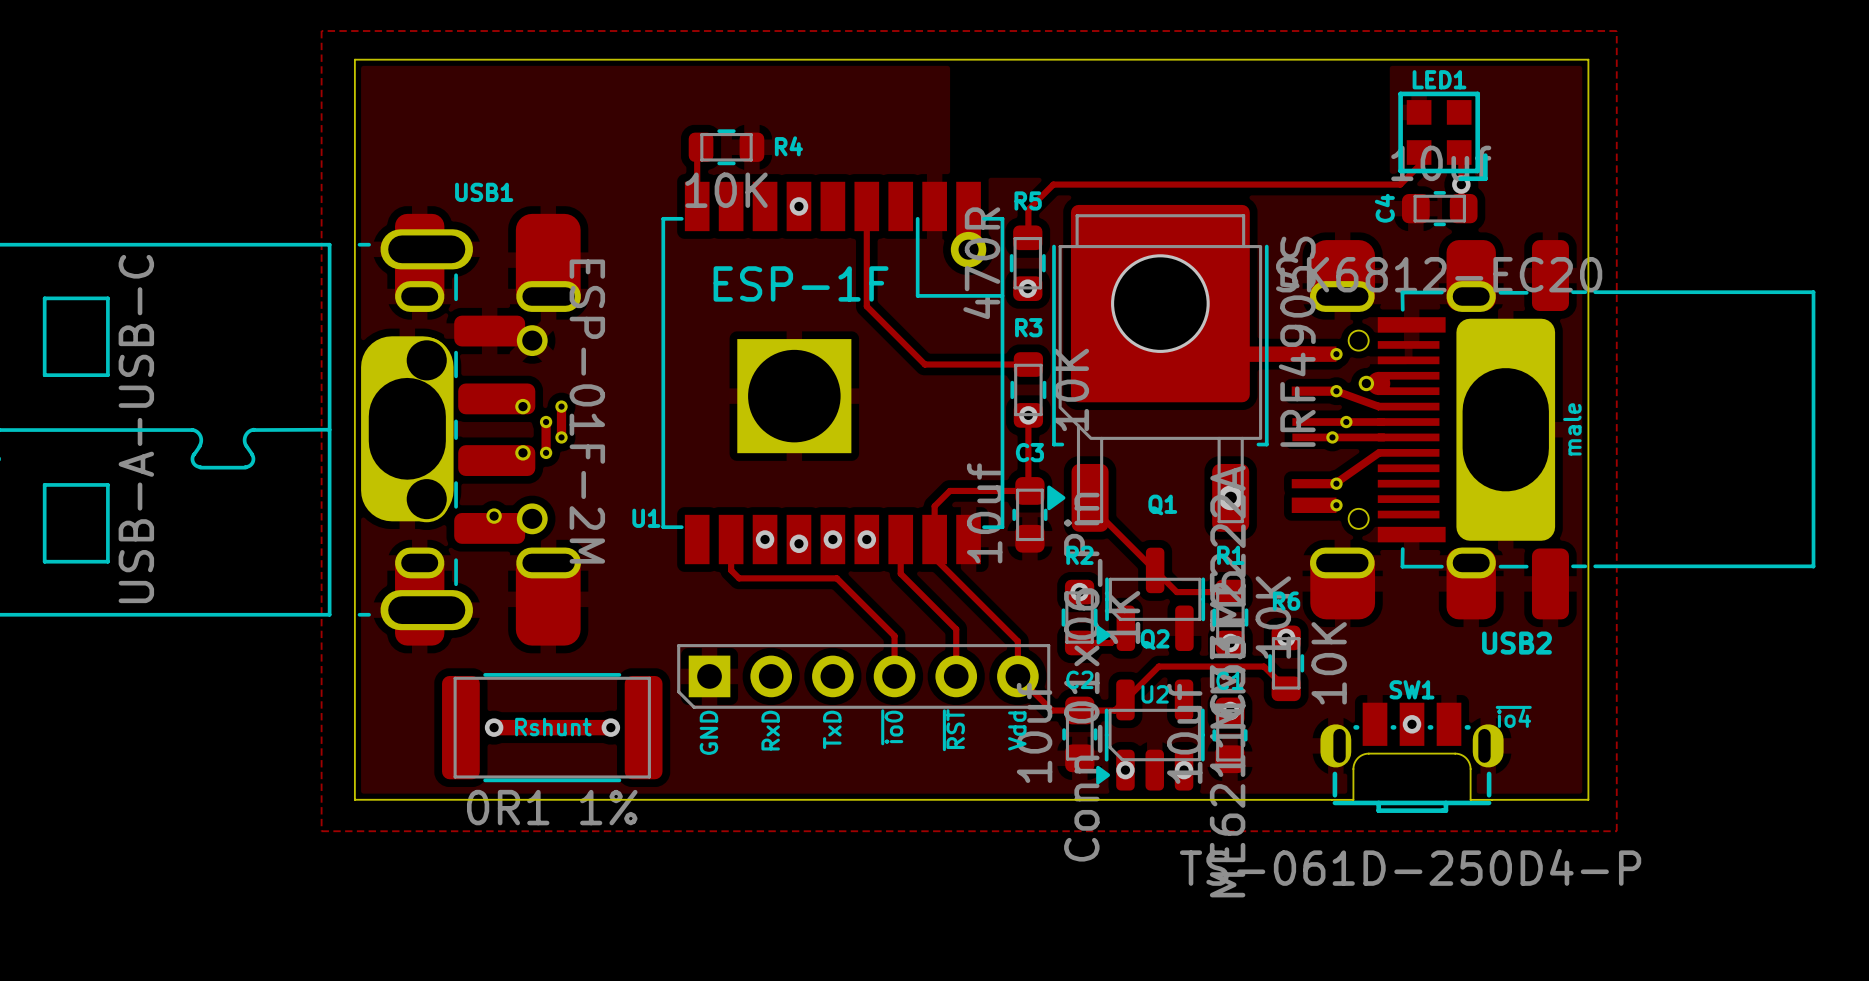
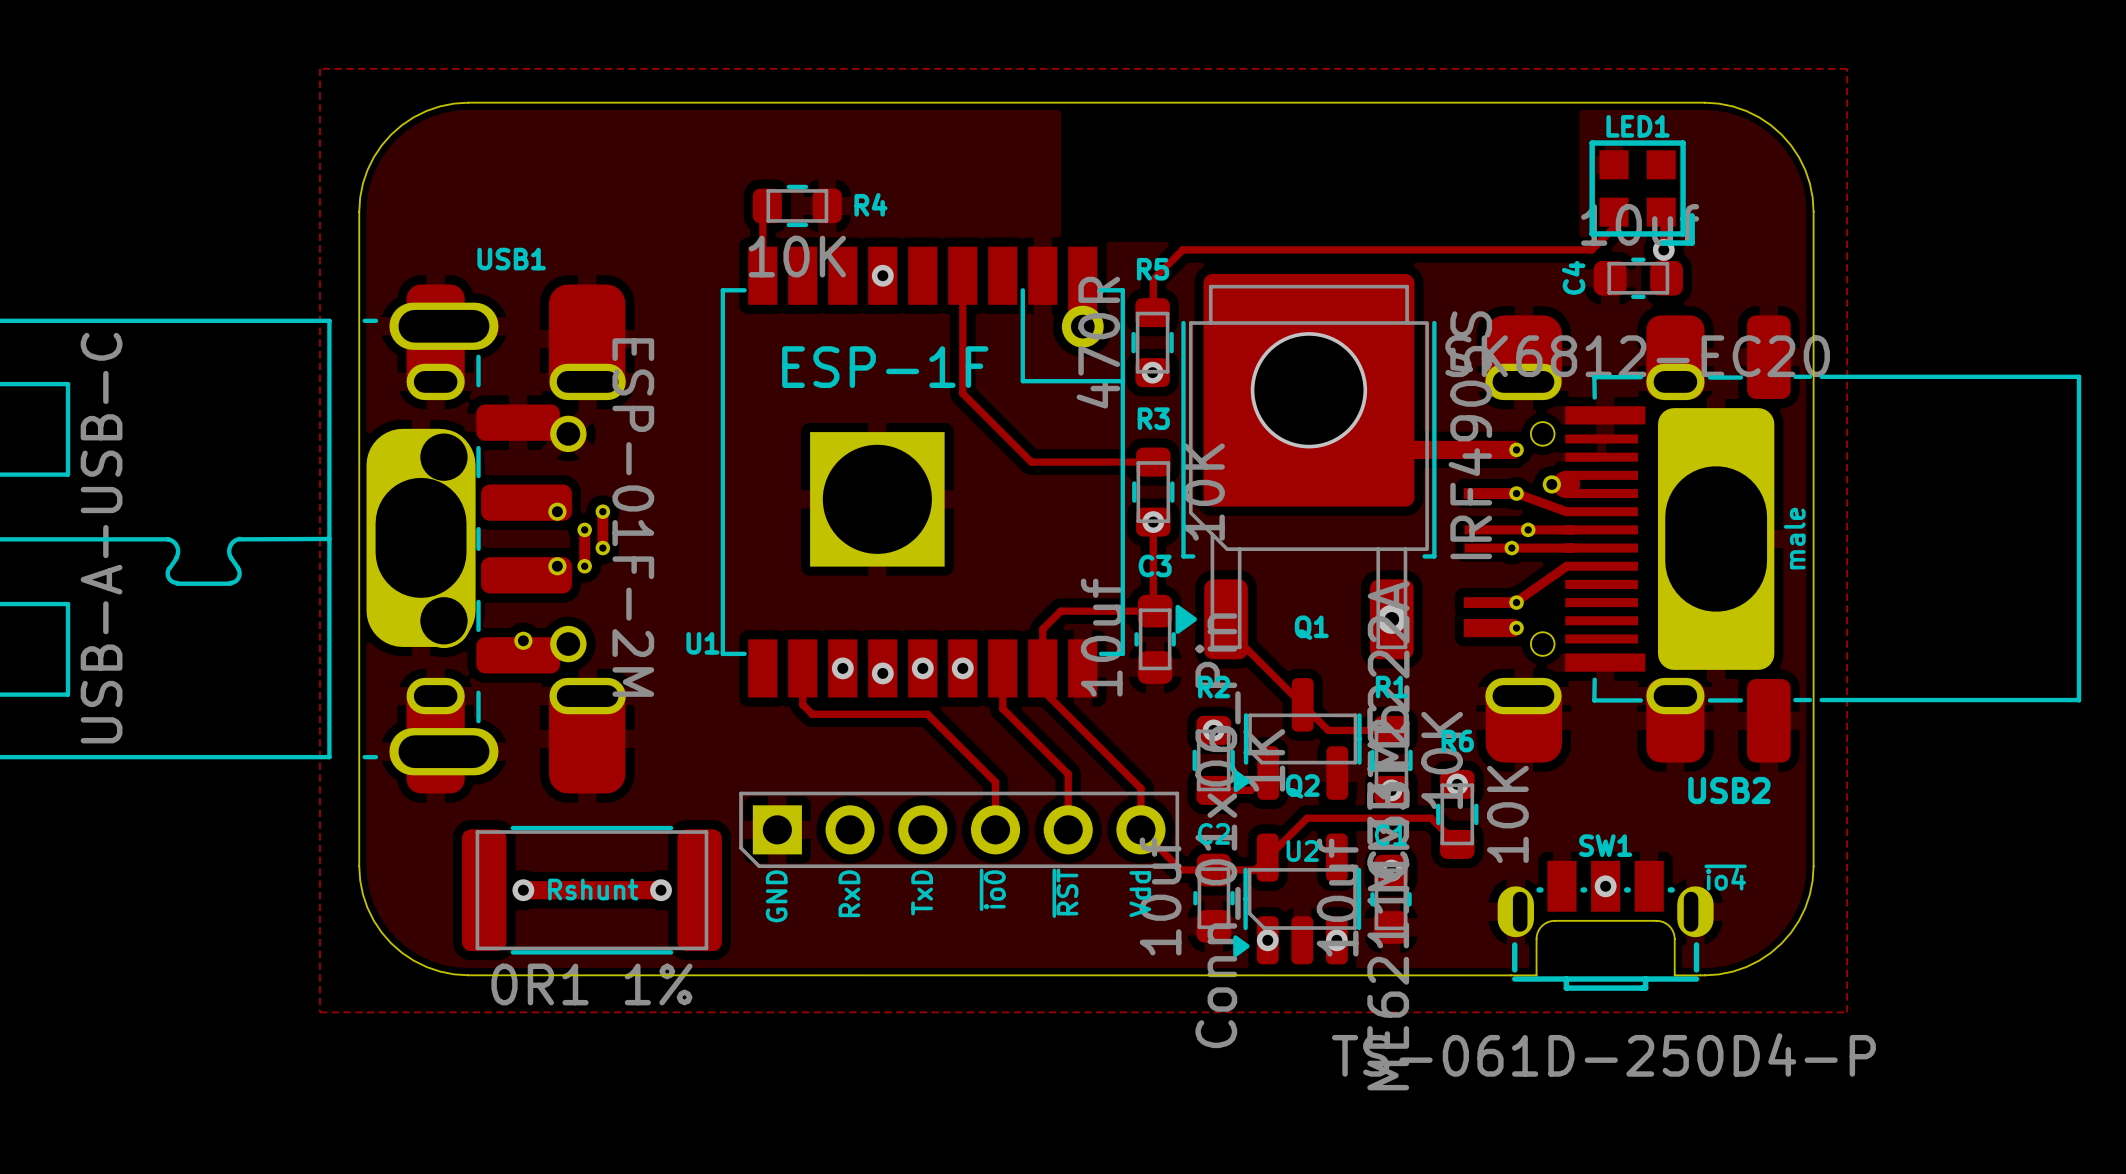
board edge: (447, 59) (354, 59) (354, 152) -> (468, 102) (440, 106) (426, 110) (401, 125) (391, 134) (381, 145) (367, 170) (362, 183) (359, 211)
board edge: (1495, 59) (1588, 59) (1588, 152) -> (1704, 102) (1718, 103) (1746, 110) (1770, 125) (1781, 134) (1791, 145) (1805, 170) (1809, 183) (1813, 211)
board edge: (354, 707) (354, 799) (447, 799) -> (359, 866) (360, 880) (367, 907) (381, 932) (391, 943) (413, 960) (426, 966) (454, 974) (468, 975)
board edge: (1588, 707) (1588, 799) (1495, 799) -> (1813, 866) (1812, 880) (1805, 908) (1791, 932) (1781, 943) (1759, 960) (1746, 967) (1732, 971) (1704, 975)

